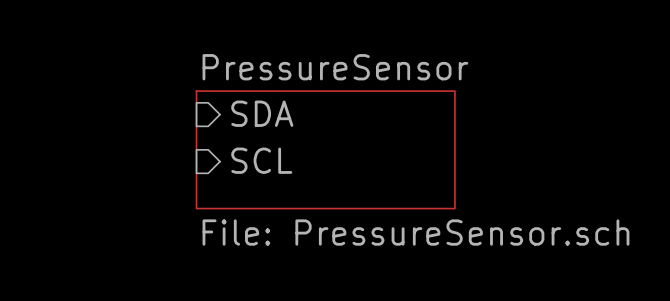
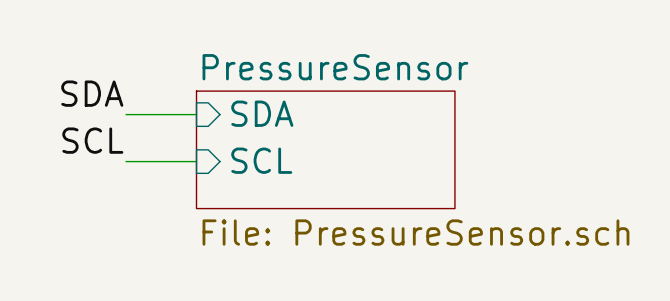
label: none -> SDA (92, 93)
wire: none -> (126, 114) (196, 114)
label: none -> SCL (92, 140)
wire: none -> (126, 161) (196, 161)

